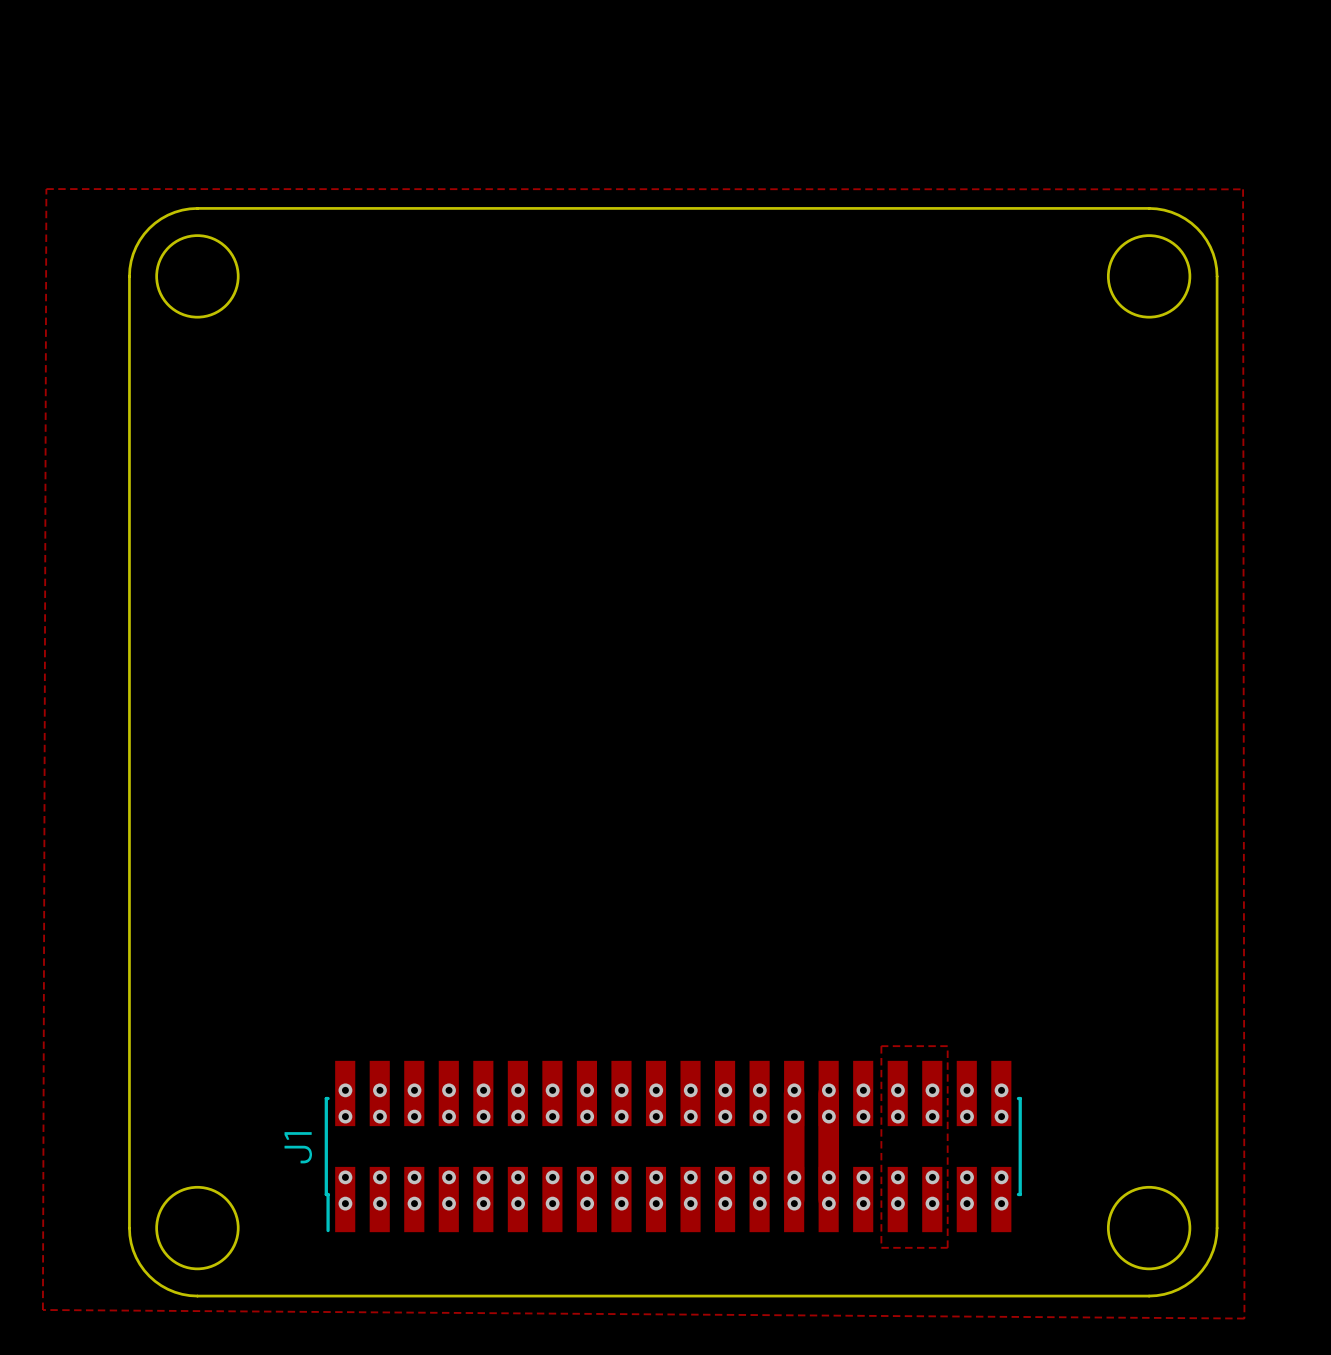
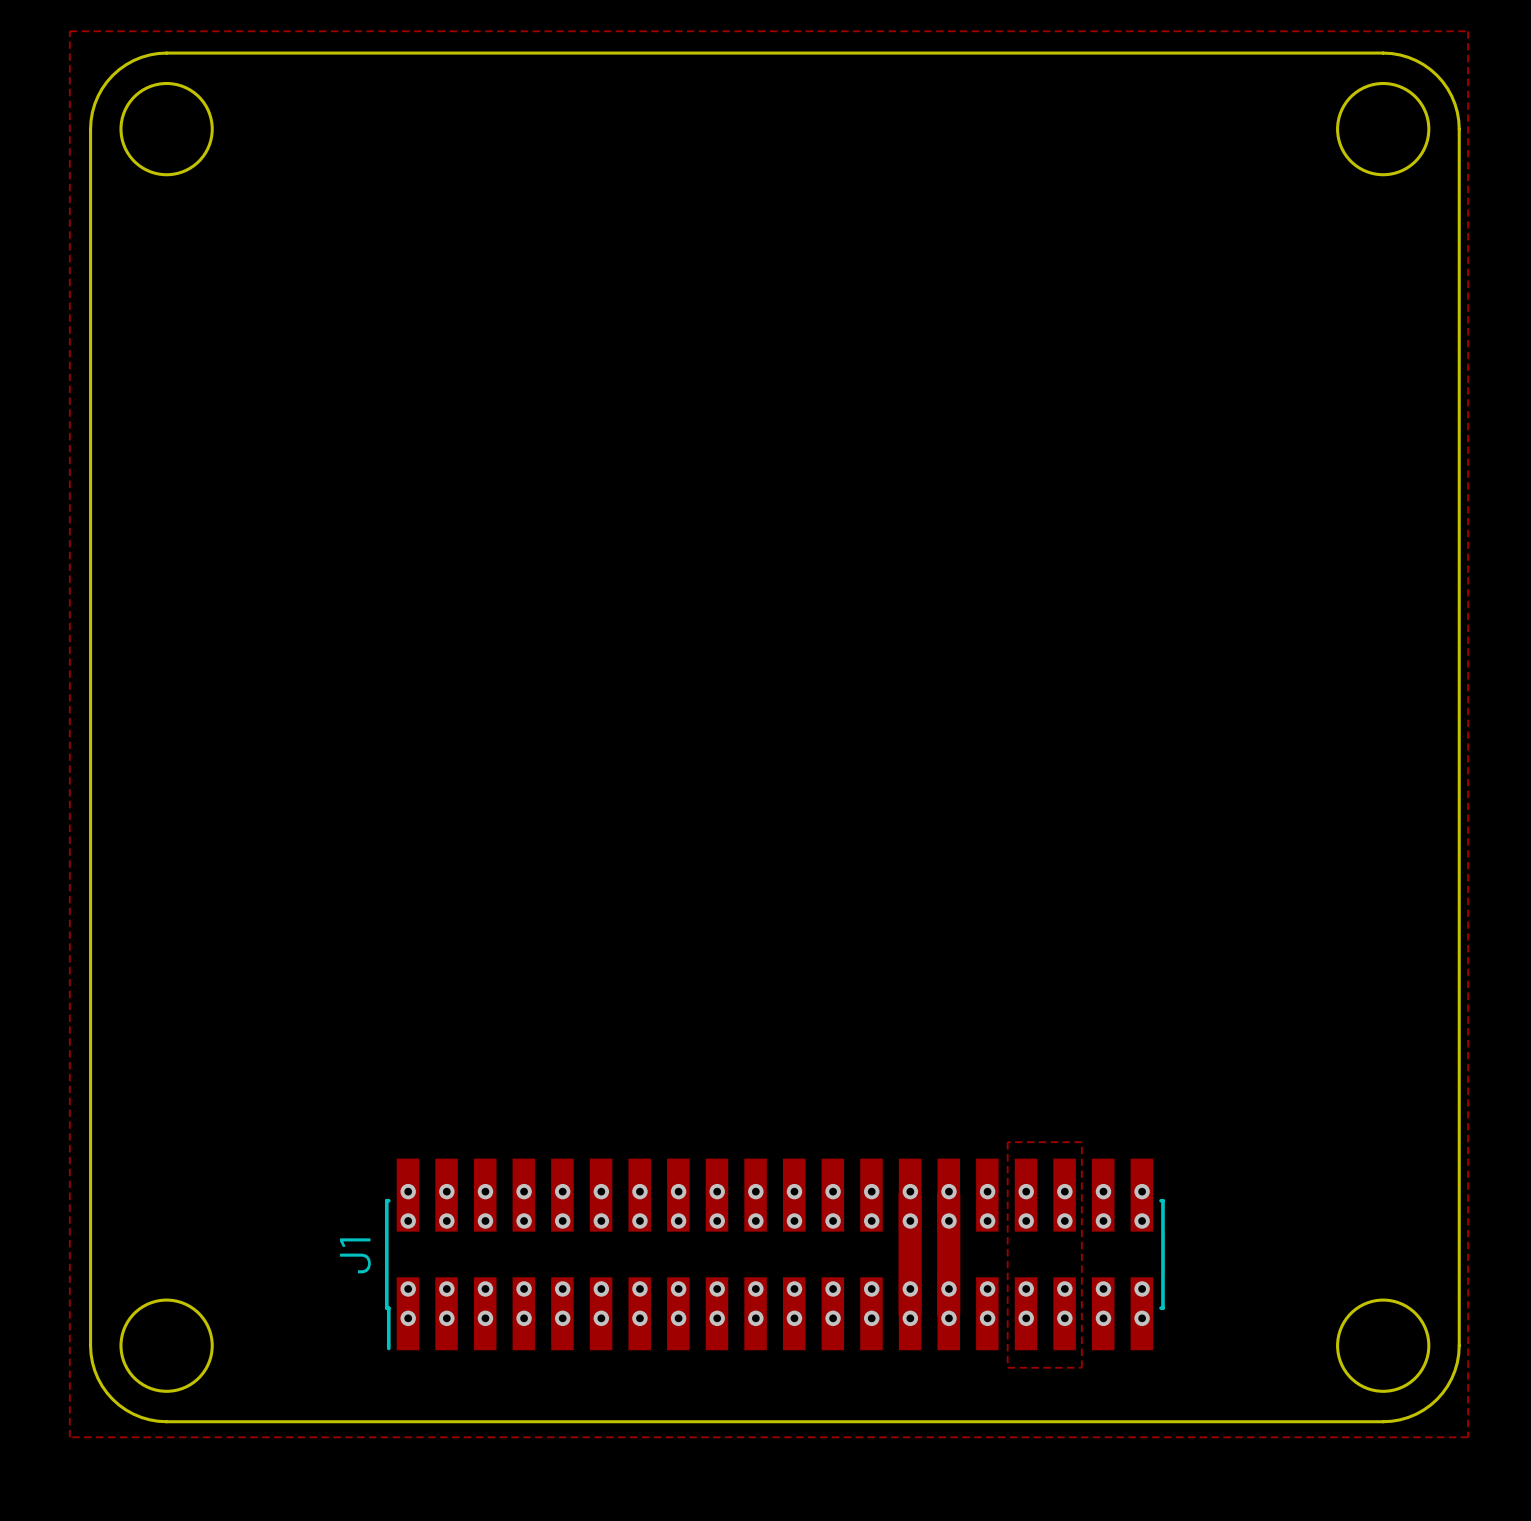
zone outline: (46, 189) (1243, 189) (1244, 1318) (42, 1309) (46, 189) -> (69, 31) (69, 1437) (1468, 1437) (1468, 31) (69, 31)
round board edge position: (197, 276) -> (166, 129)
round board edge position: (1149, 276) -> (1383, 129)
round board edge position: (197, 1228) -> (166, 1345)
round board edge position: (1149, 1228) -> (1383, 1345)
board edge: (197, 1296) (182, 1294) (167, 1289) (149, 1276) (136, 1257) (131, 1243) (129, 1228) (129, 268) (133, 253) (139, 240) (155, 223) (174, 212) (197, 208) (1149, 208) (1164, 210) (1178, 215) (1191, 223) (1202, 234) (1213, 253) (1217, 276) (1217, 1228) (1215, 1243) (1210, 1257) (1197, 1276) (1185, 1285) (1171, 1292) (1149, 1296) -> (242, 1421) (158, 1421) (133, 1414) (119, 1405) (107, 1393) (98, 1378) (91, 1354) (90, 129) (94, 103) (102, 88) (112, 75) (133, 60) (158, 53) (1383, 53) (1400, 54) (1416, 60) (1430, 69) (1442, 81) (1454, 103) (1459, 129) (1458, 1354) (1454, 1370) (1442, 1393) (1430, 1405) (1416, 1414) (1391, 1421) (1307, 1421)

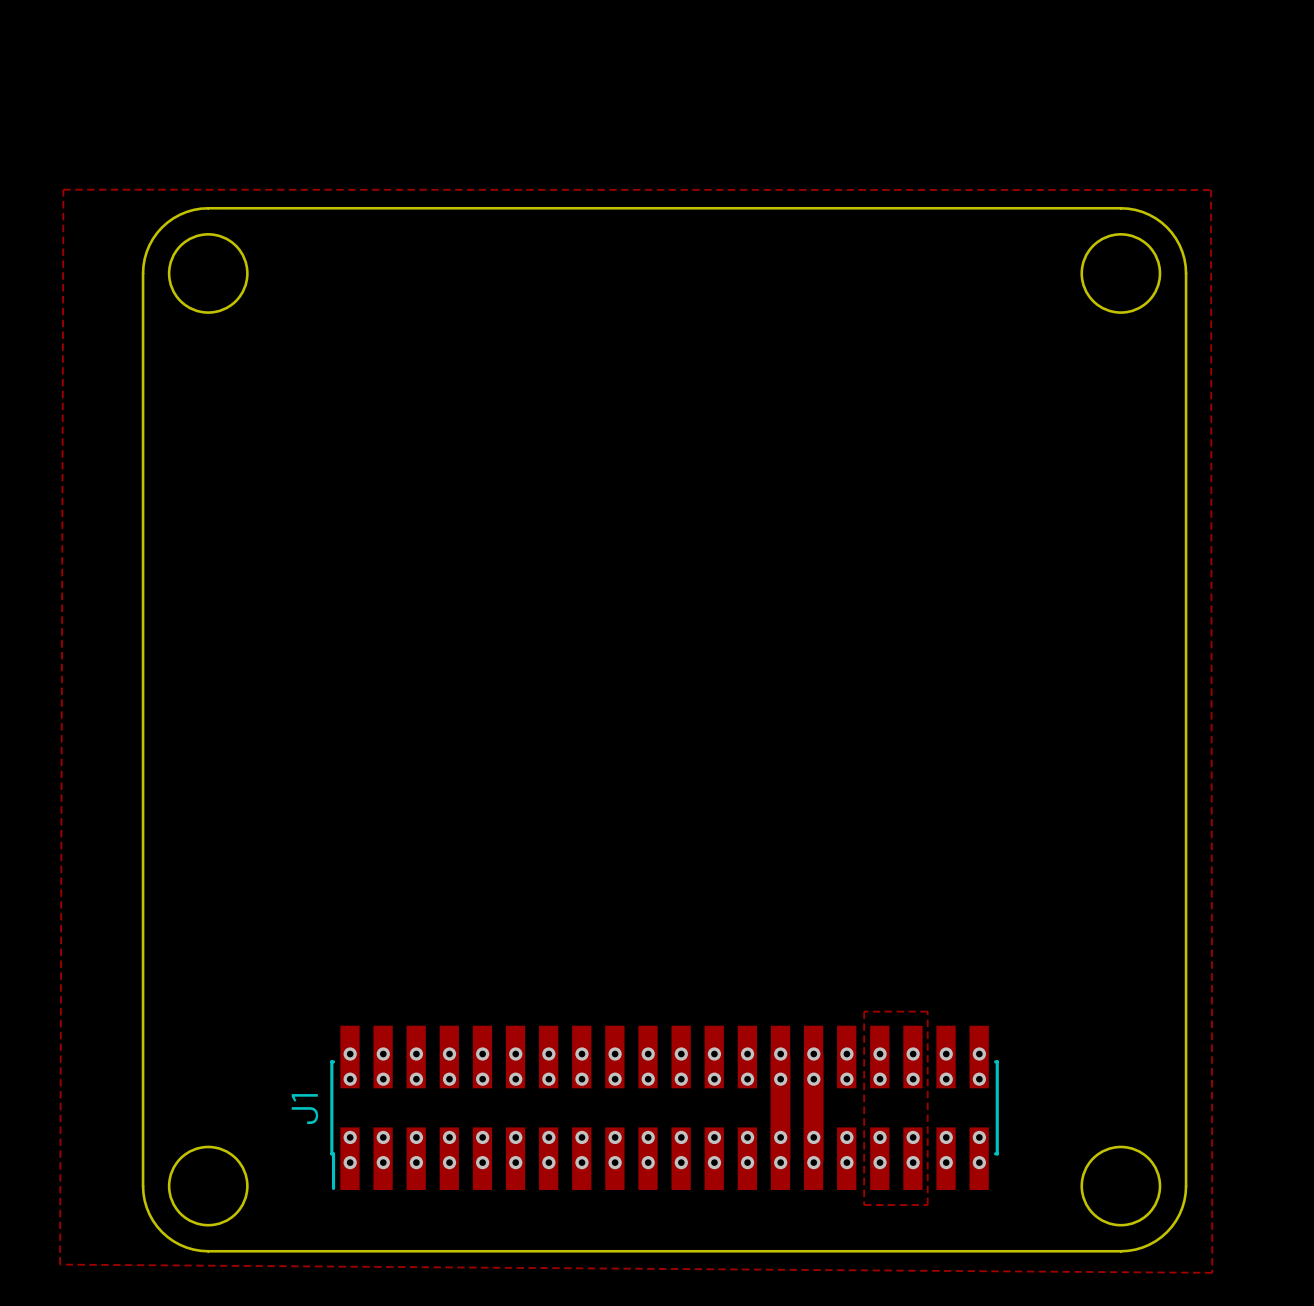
zone outline: (69, 31) (1468, 31) (1468, 1437) (69, 1437) (69, 31) -> (63, 189) (60, 1264) (1212, 1272) (1210, 189) (63, 189)
round board edge position: (166, 129) -> (208, 273)
round board edge position: (1383, 129) -> (1120, 273)
round board edge position: (166, 1345) -> (208, 1186)
round board edge position: (1383, 1345) -> (1120, 1186)
board edge: (242, 1421) (158, 1421) (133, 1414) (119, 1405) (107, 1393) (98, 1378) (91, 1354) (90, 129) (94, 103) (102, 88) (112, 75) (133, 60) (158, 53) (1383, 53) (1400, 54) (1416, 60) (1430, 69) (1442, 81) (1454, 103) (1459, 129) (1458, 1354) (1454, 1370) (1442, 1393) (1430, 1405) (1416, 1414) (1391, 1421) (1307, 1421) -> (208, 1251) (193, 1249) (179, 1244) (162, 1232) (149, 1214) (144, 1200) (143, 1186) (143, 266) (146, 251) (153, 238) (167, 222) (186, 211) (208, 208) (1120, 208) (1135, 209) (1149, 214) (1161, 222) (1171, 232) (1182, 251) (1186, 273) (1186, 1186) (1184, 1200) (1179, 1214) (1166, 1232) (1155, 1241) (1142, 1247) (1120, 1251)

